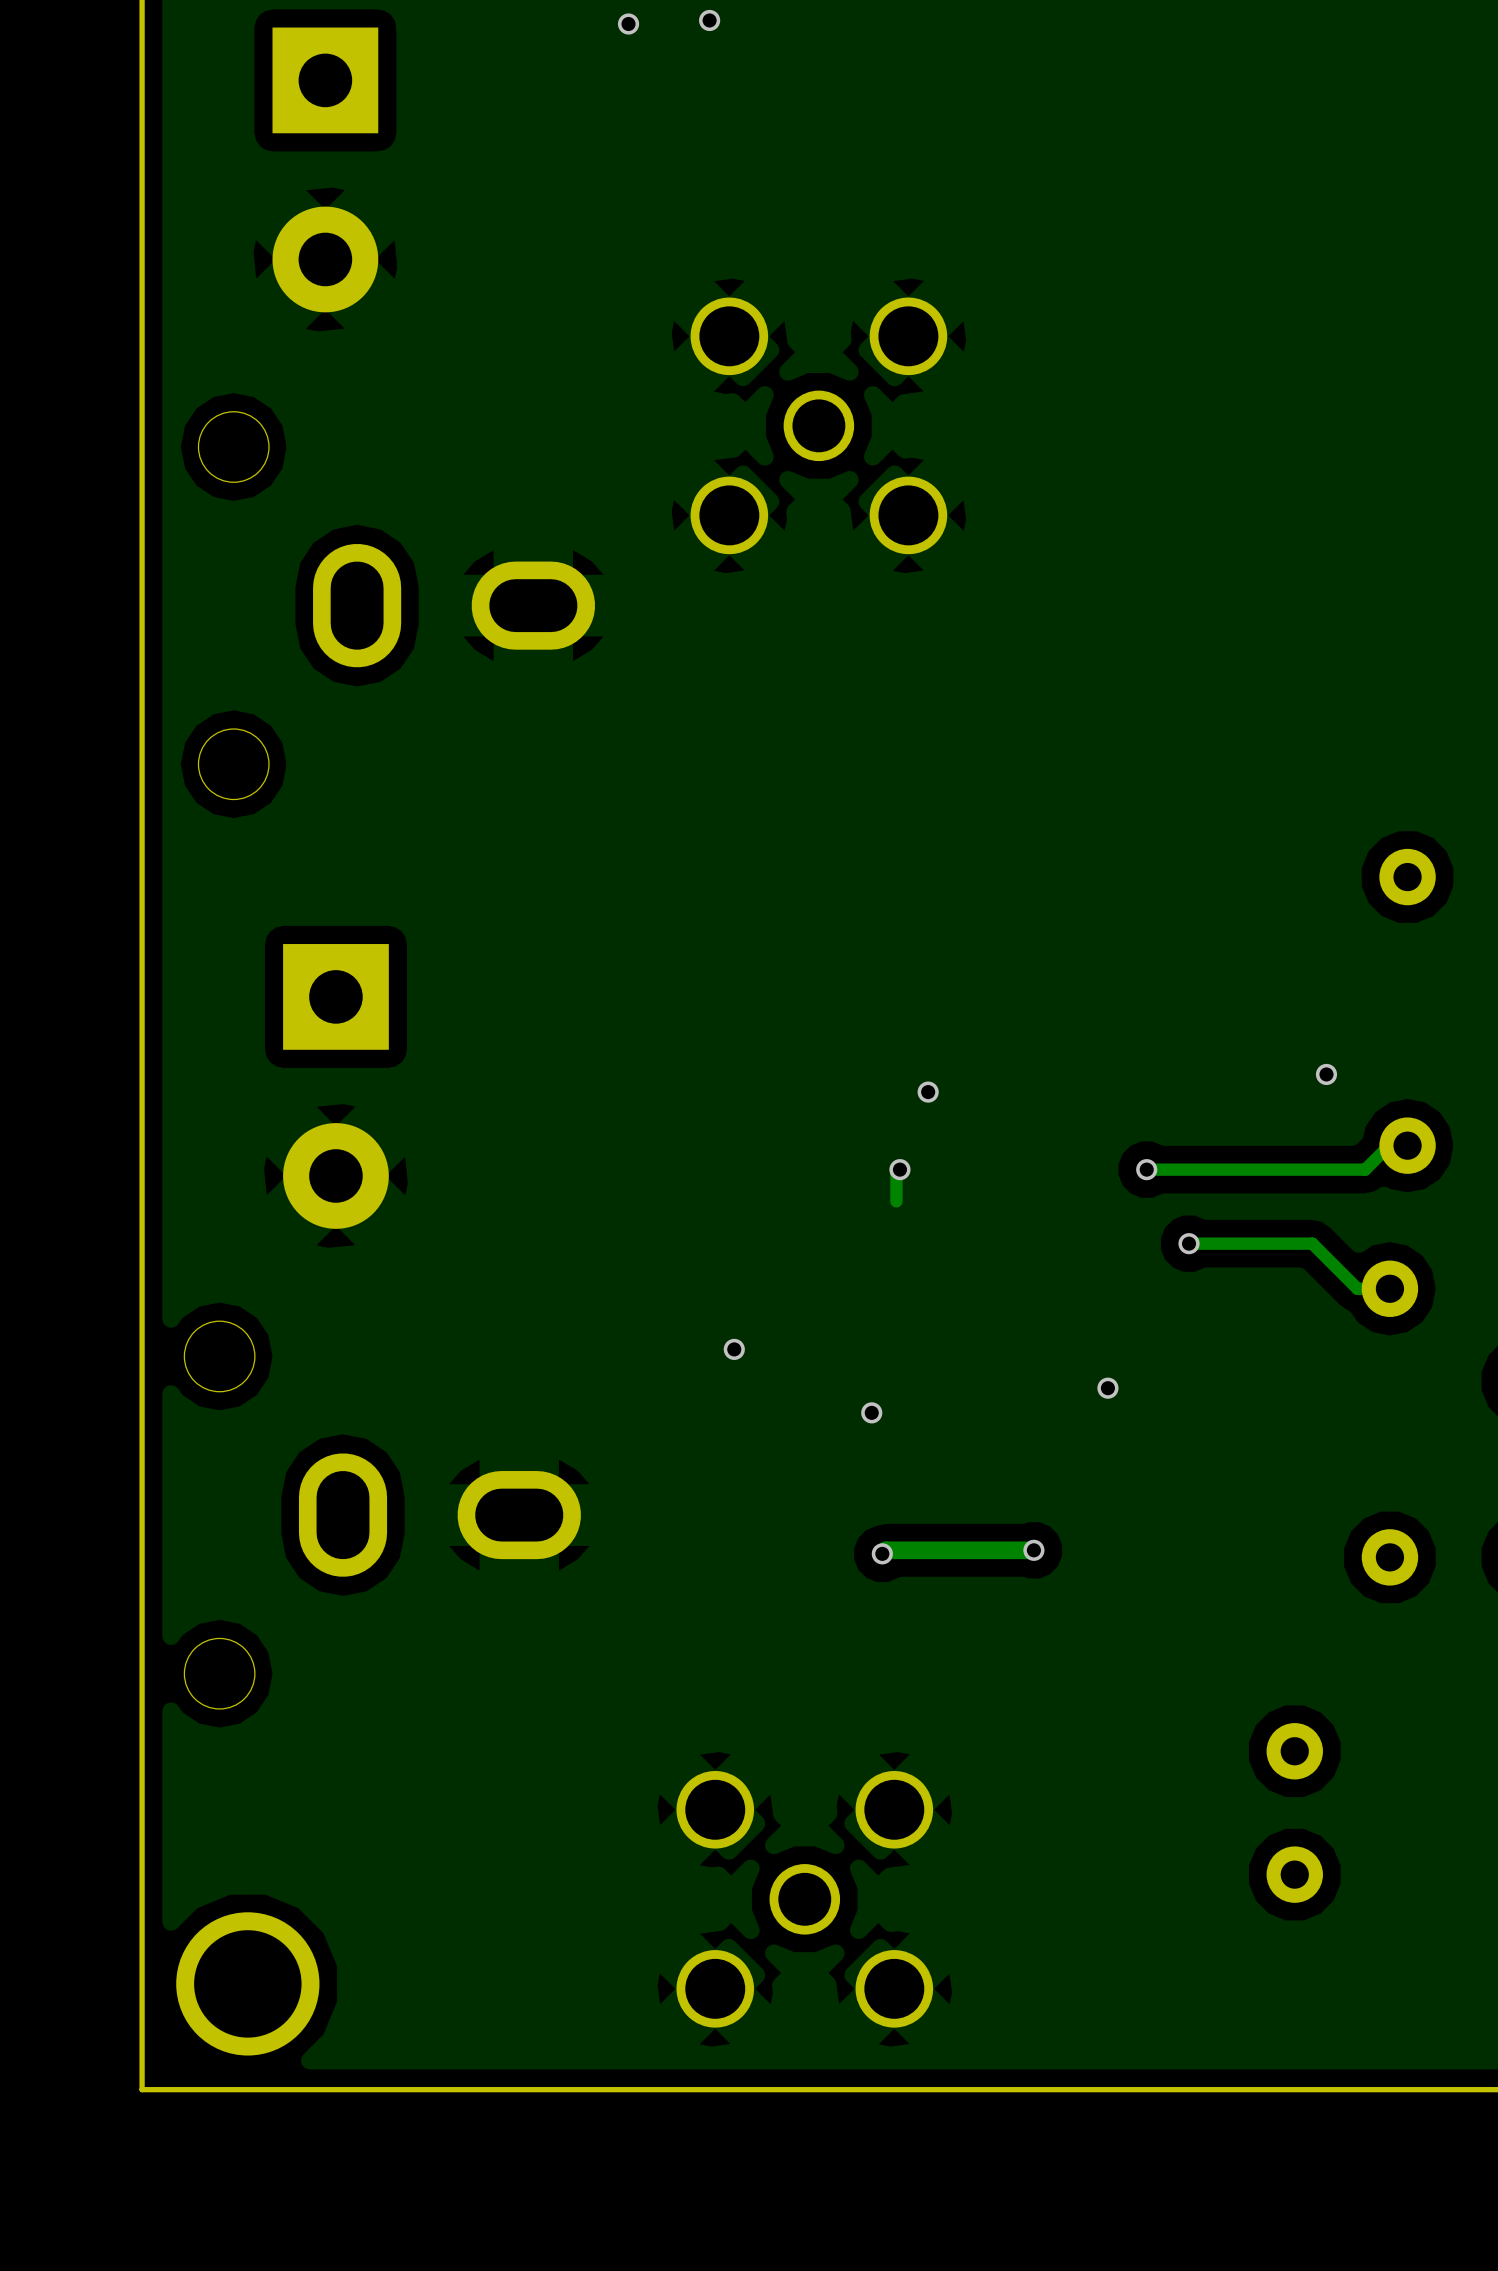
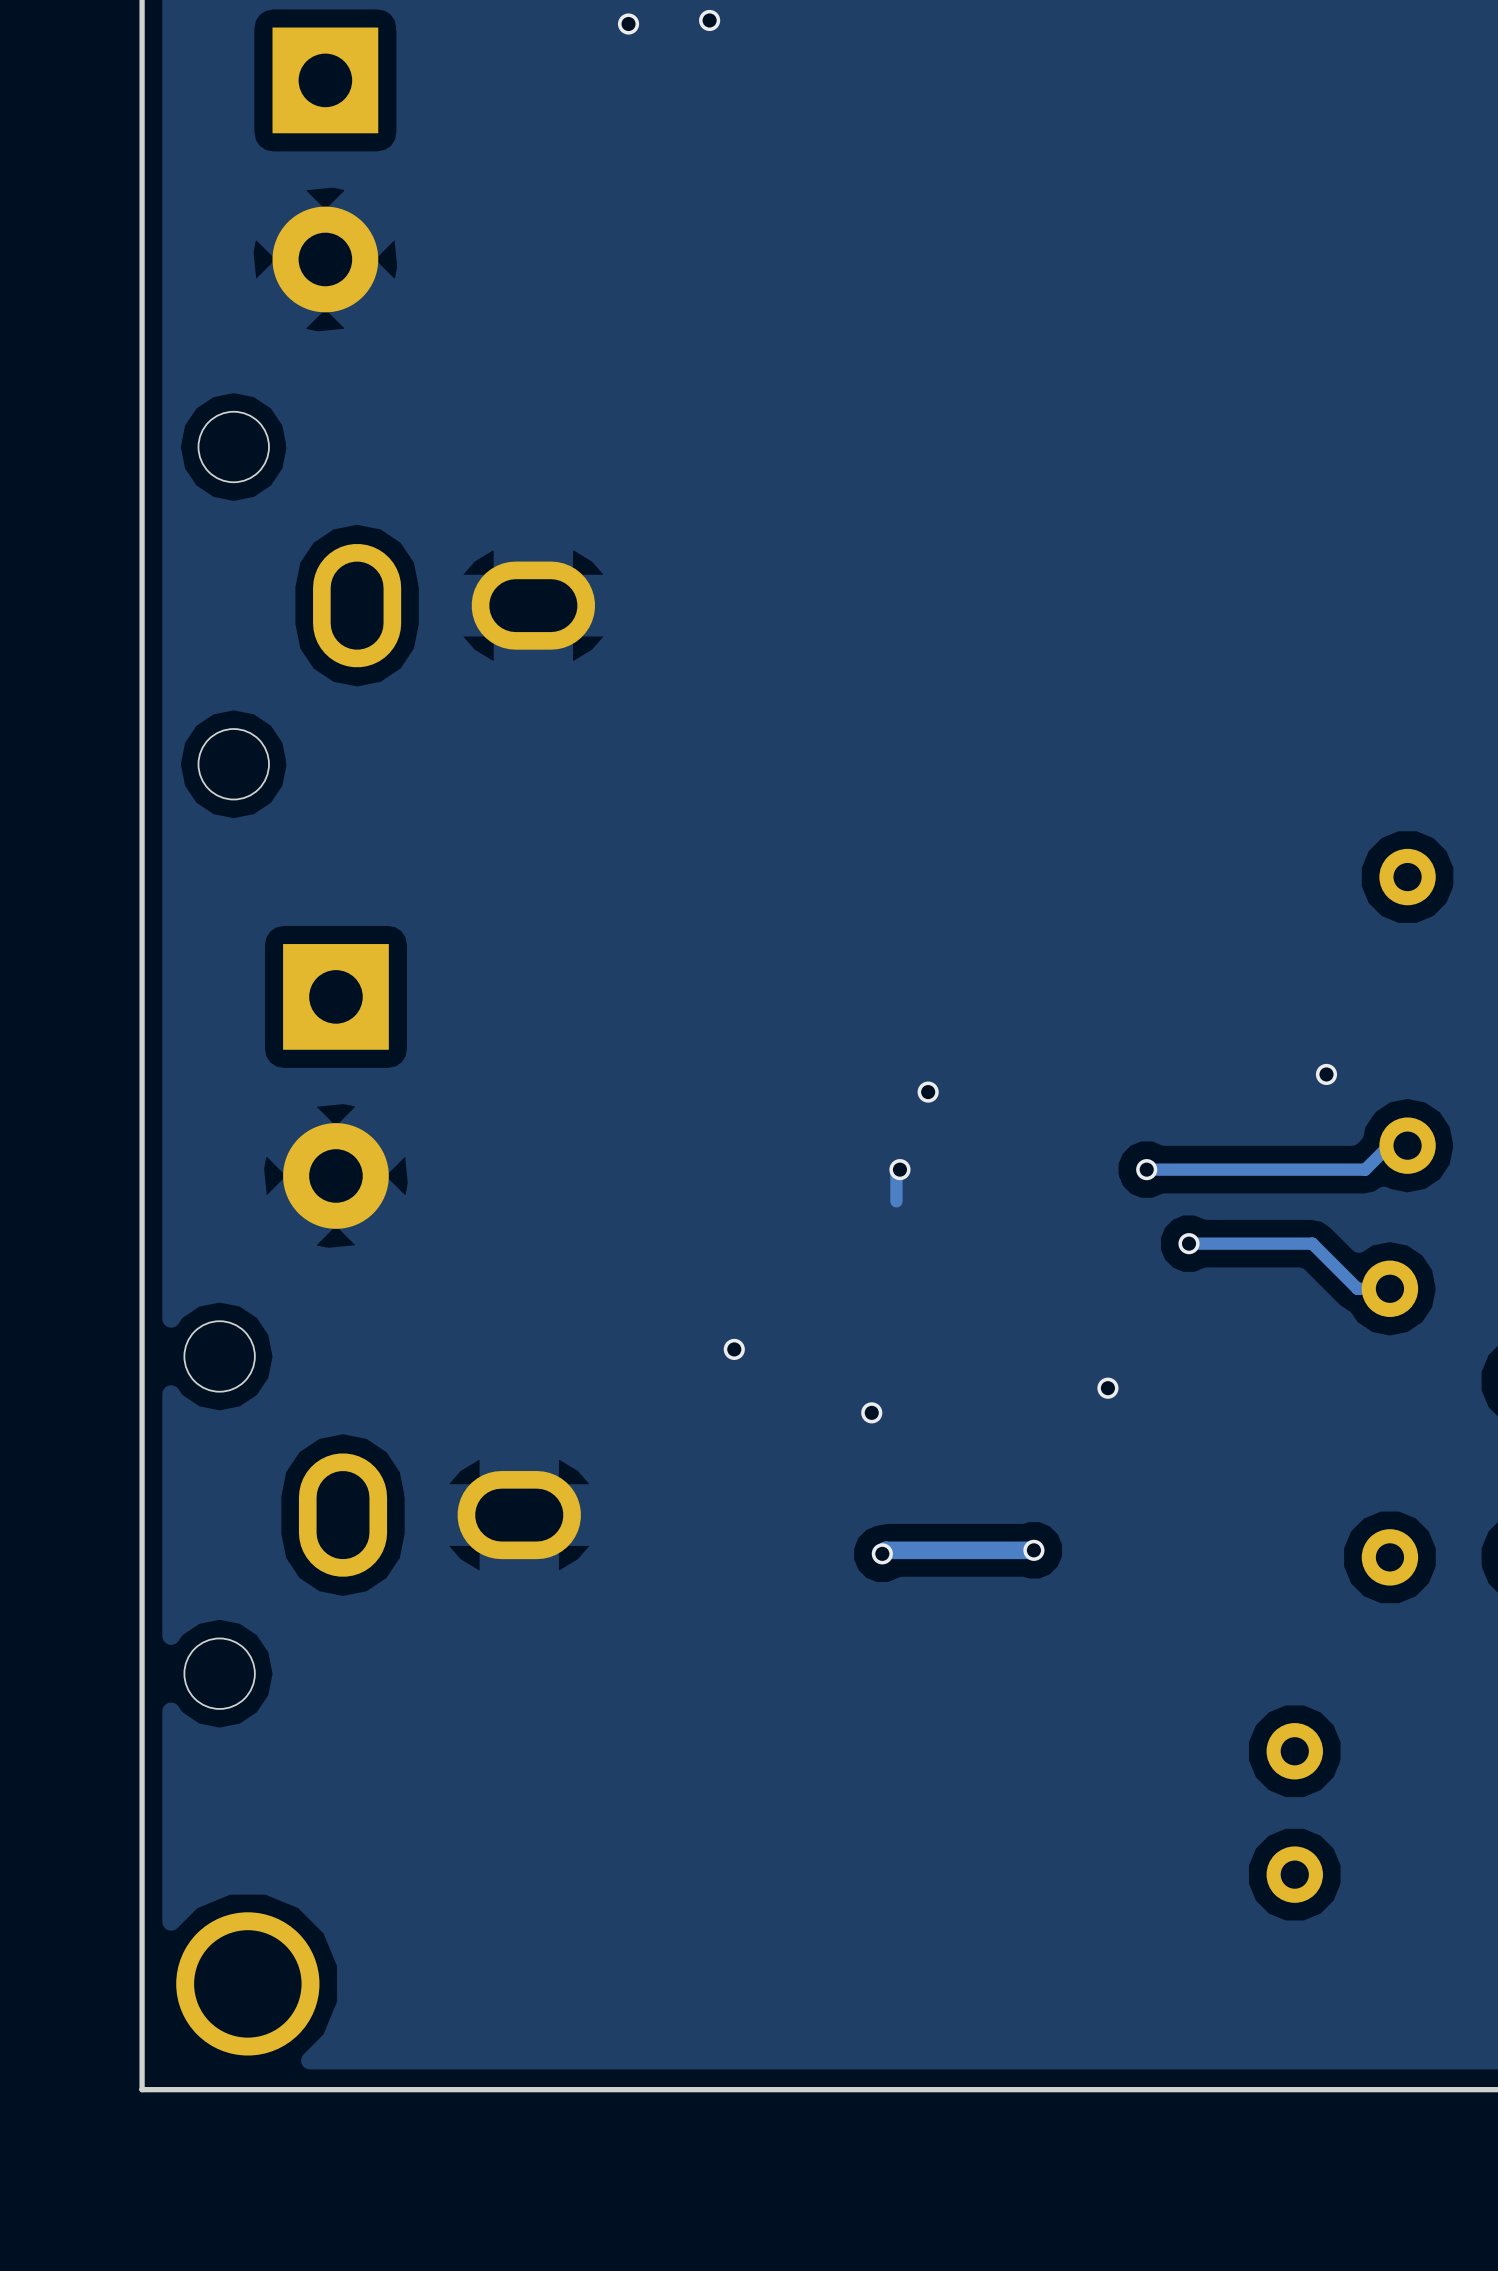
part: (818, 425) -> none
part: (804, 1899) -> none

